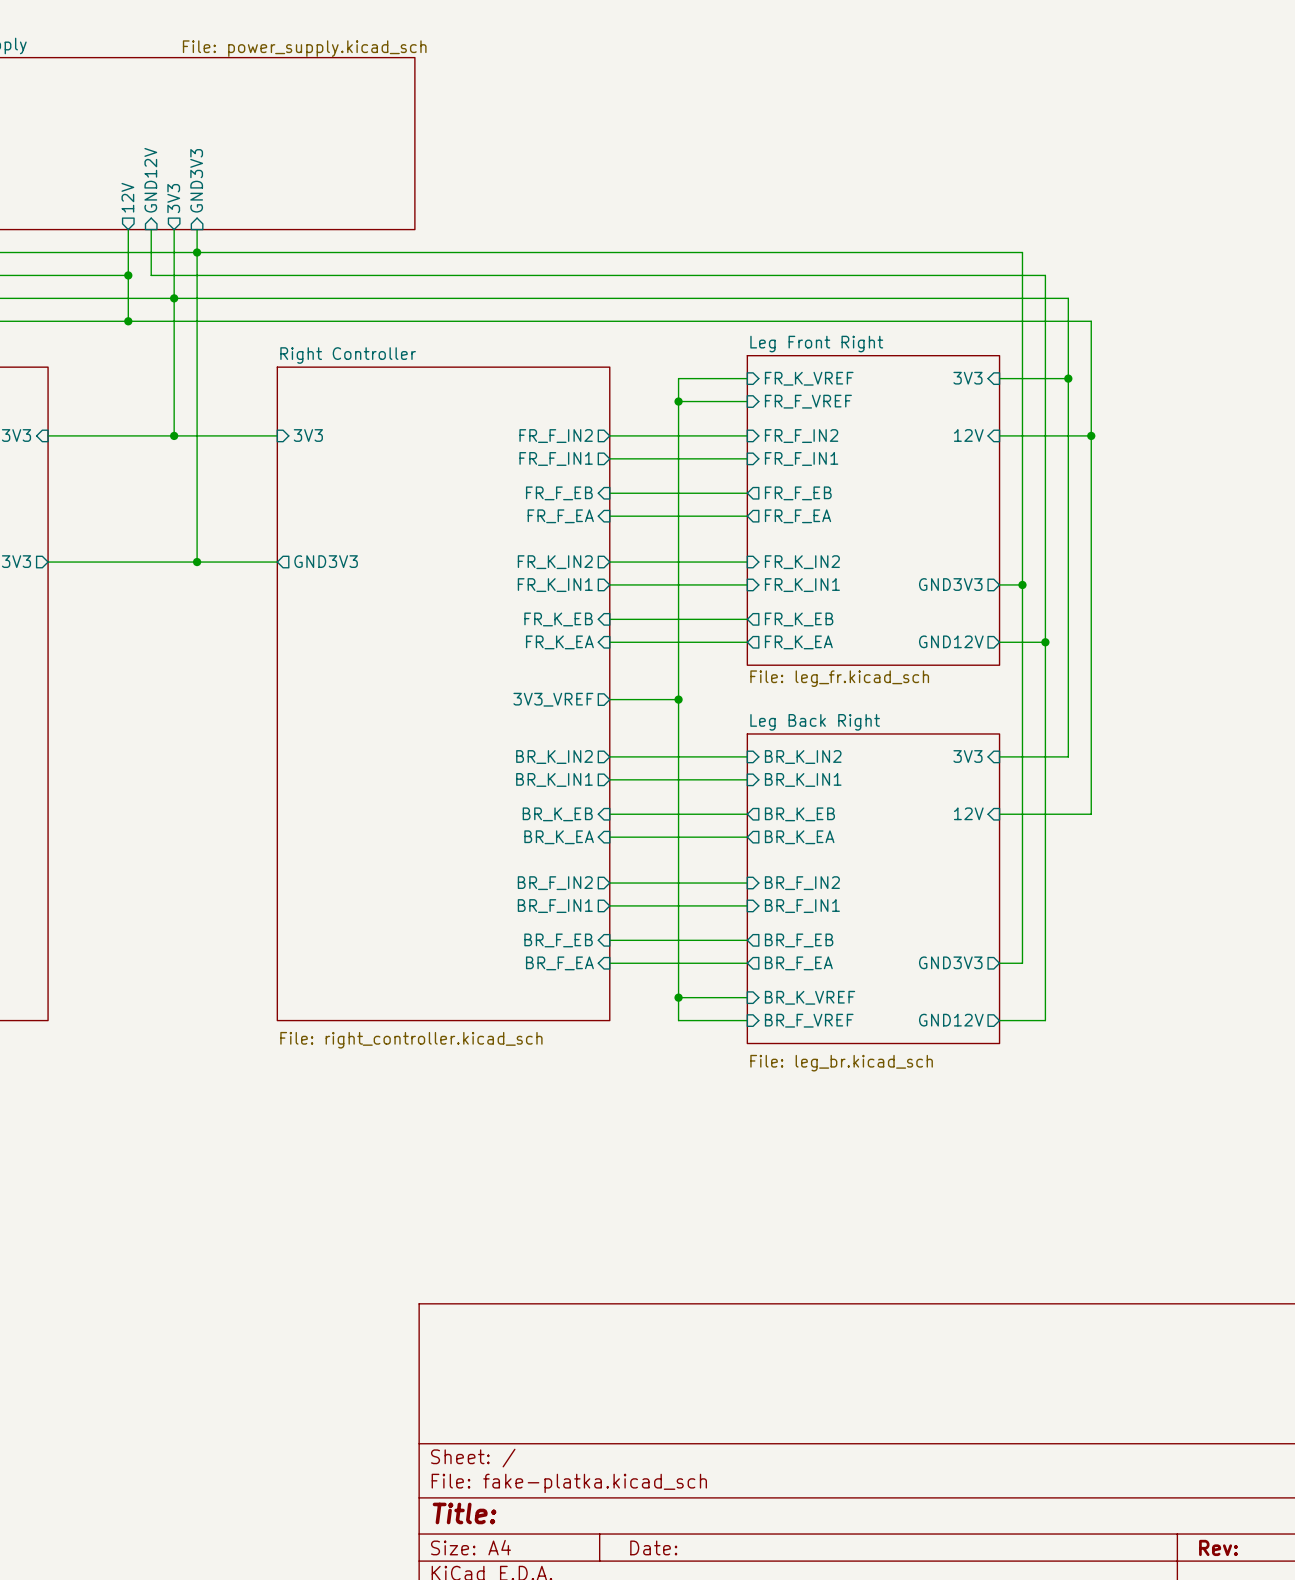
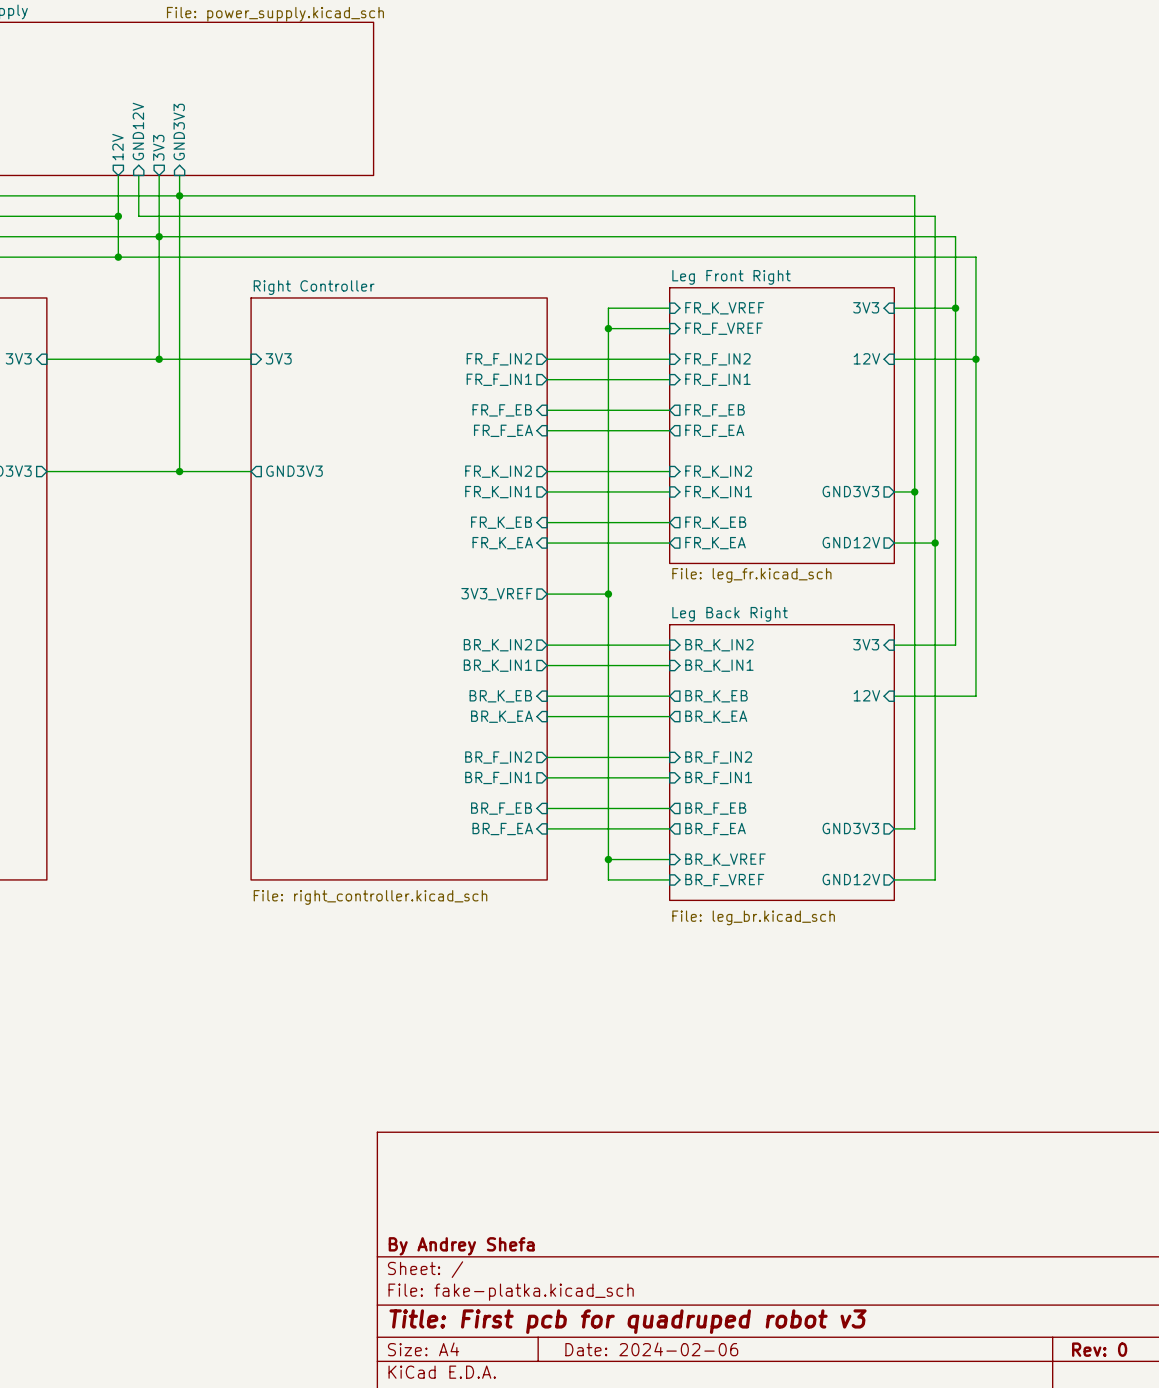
title block: none -> By Andrey Shefa (461, 1246)
title block: Title: (464, 1513) -> Title: First pcb for quadruped robot v3 (628, 1321)
title block: Date: (653, 1547) -> Date: 2024-02-06 (651, 1349)
title block: Rev: (1218, 1547) -> Rev: 0 (1099, 1349)

